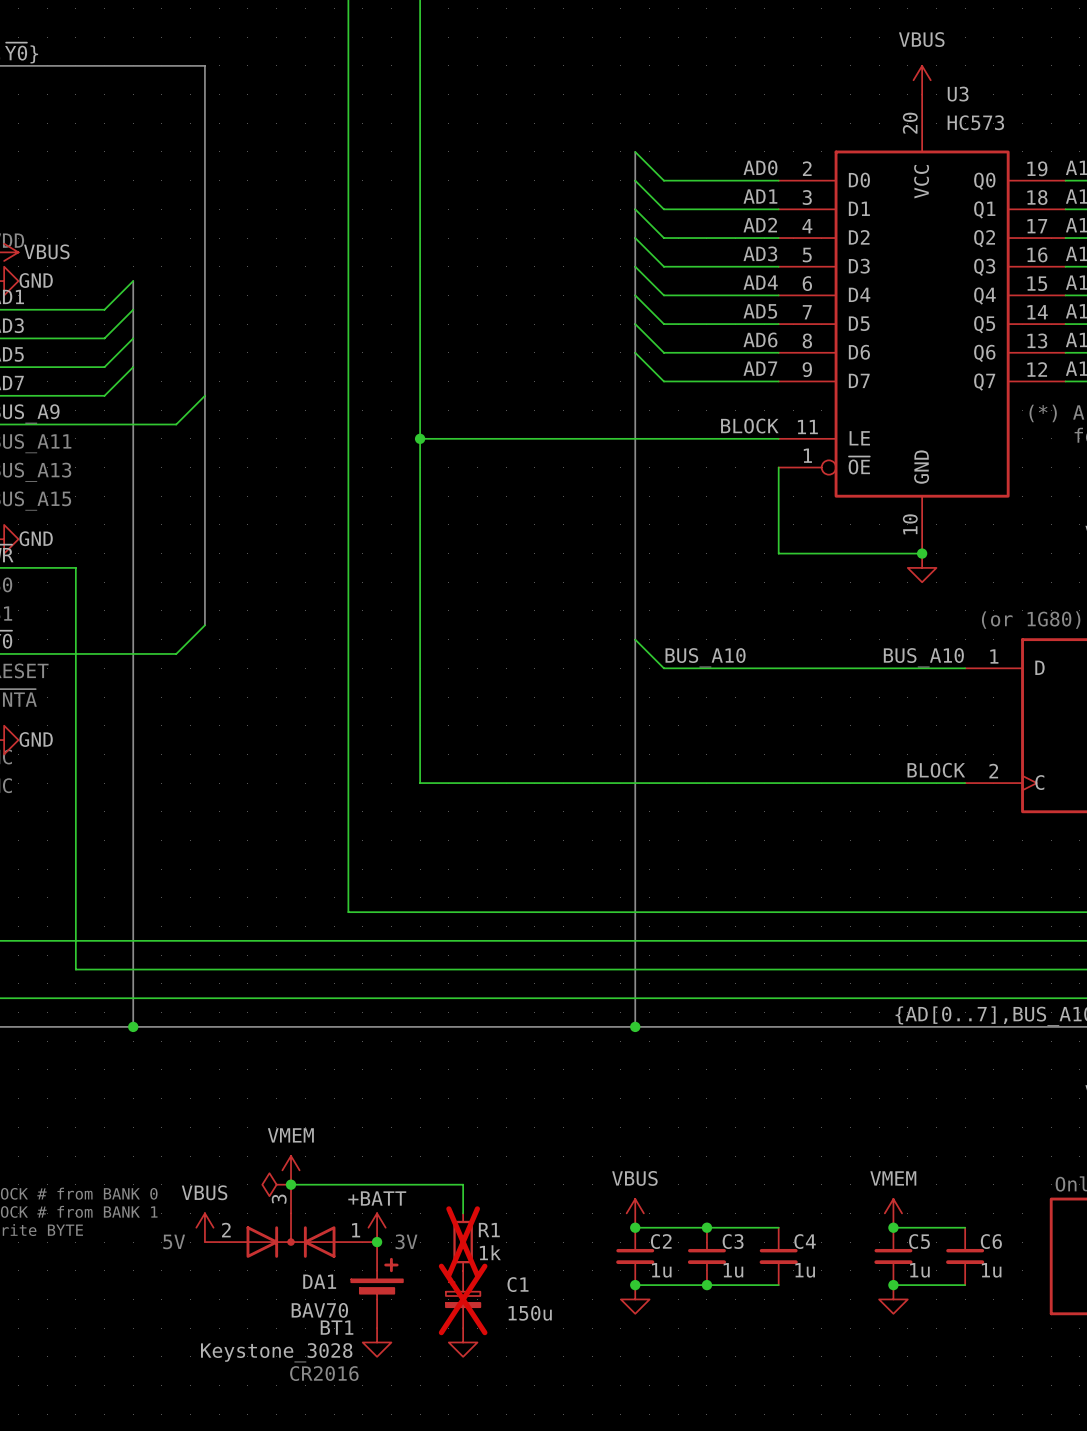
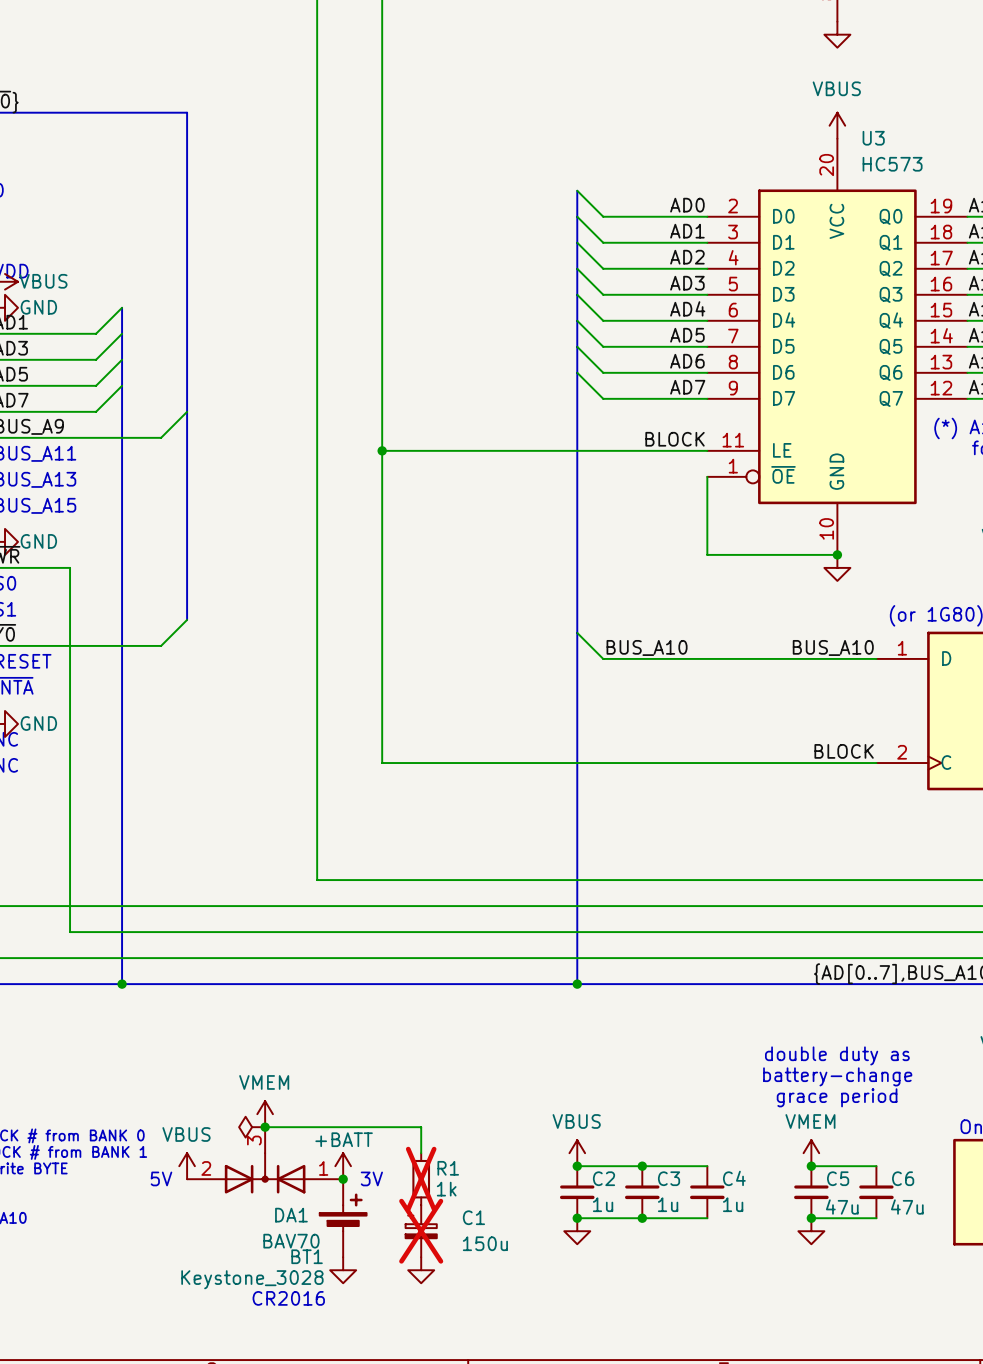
text: none -> double duty as (837, 1055)
text: none -> battery-change (837, 1076)
text: none -> grace period (837, 1097)
C5 value: 1u (919, 1270) -> 47u (842, 1207)
C6 value: 1u (991, 1270) -> 47u (907, 1207)

